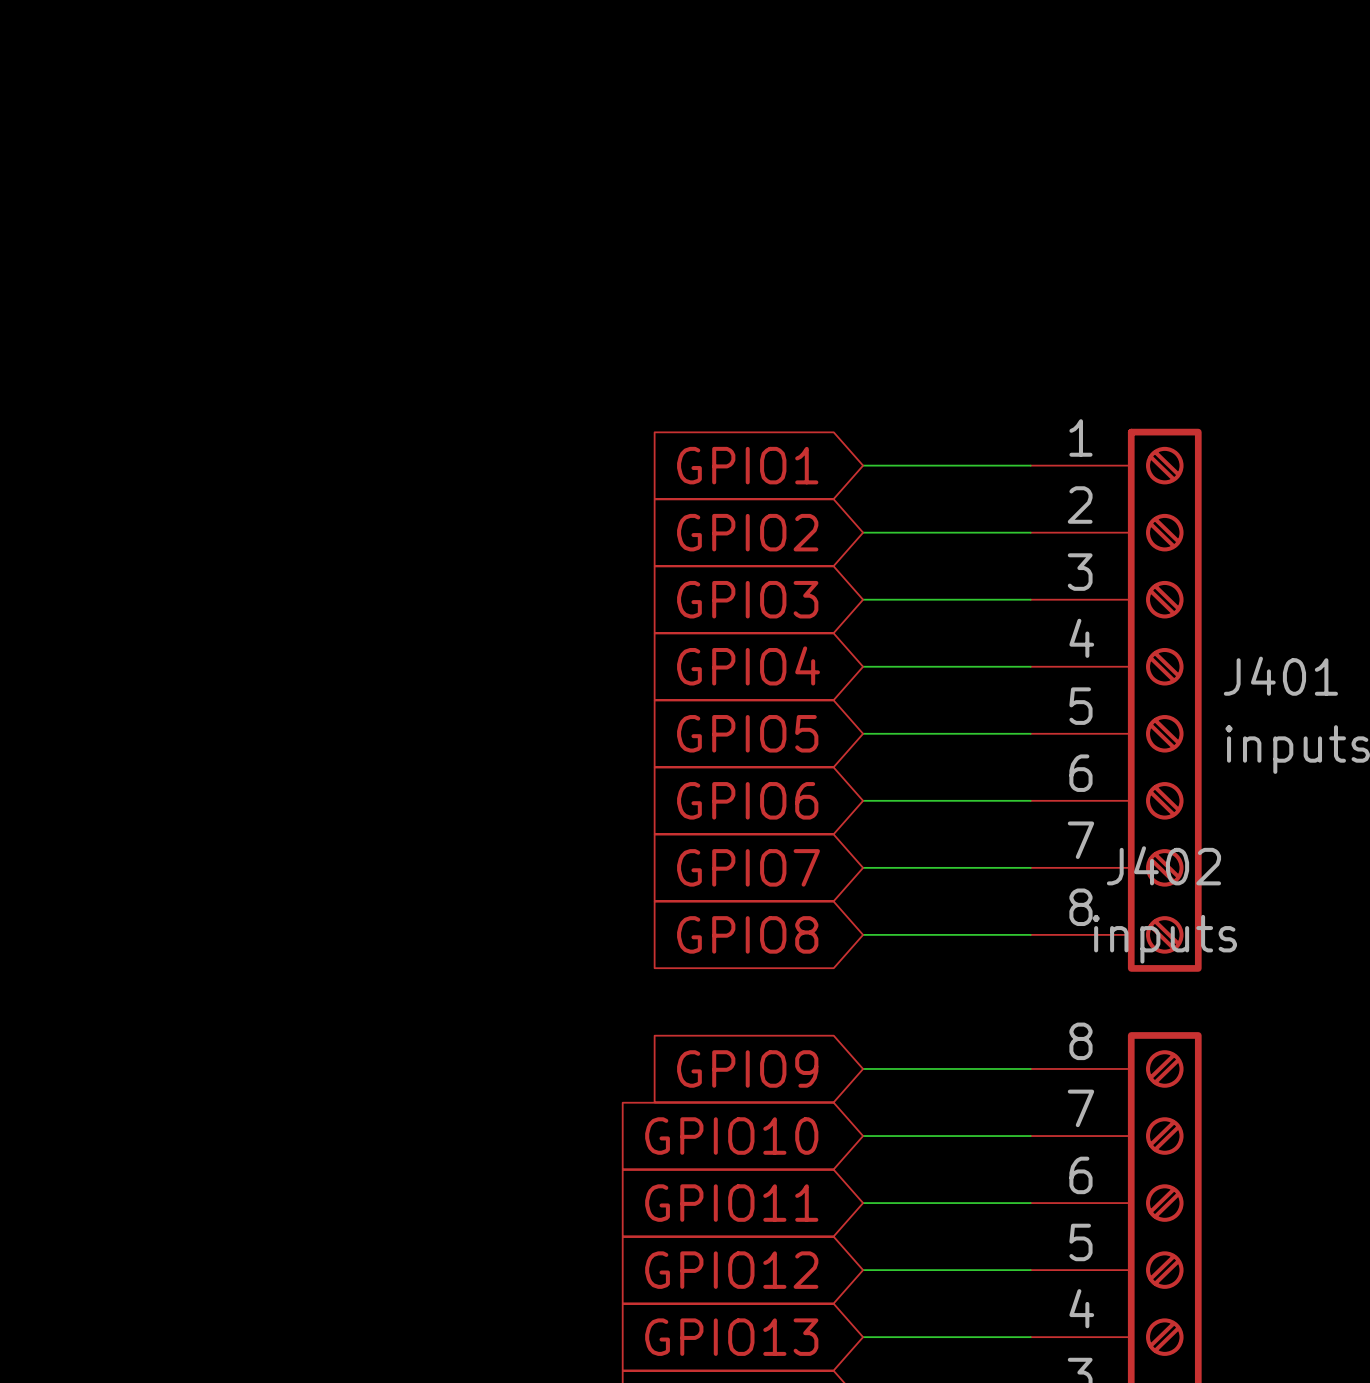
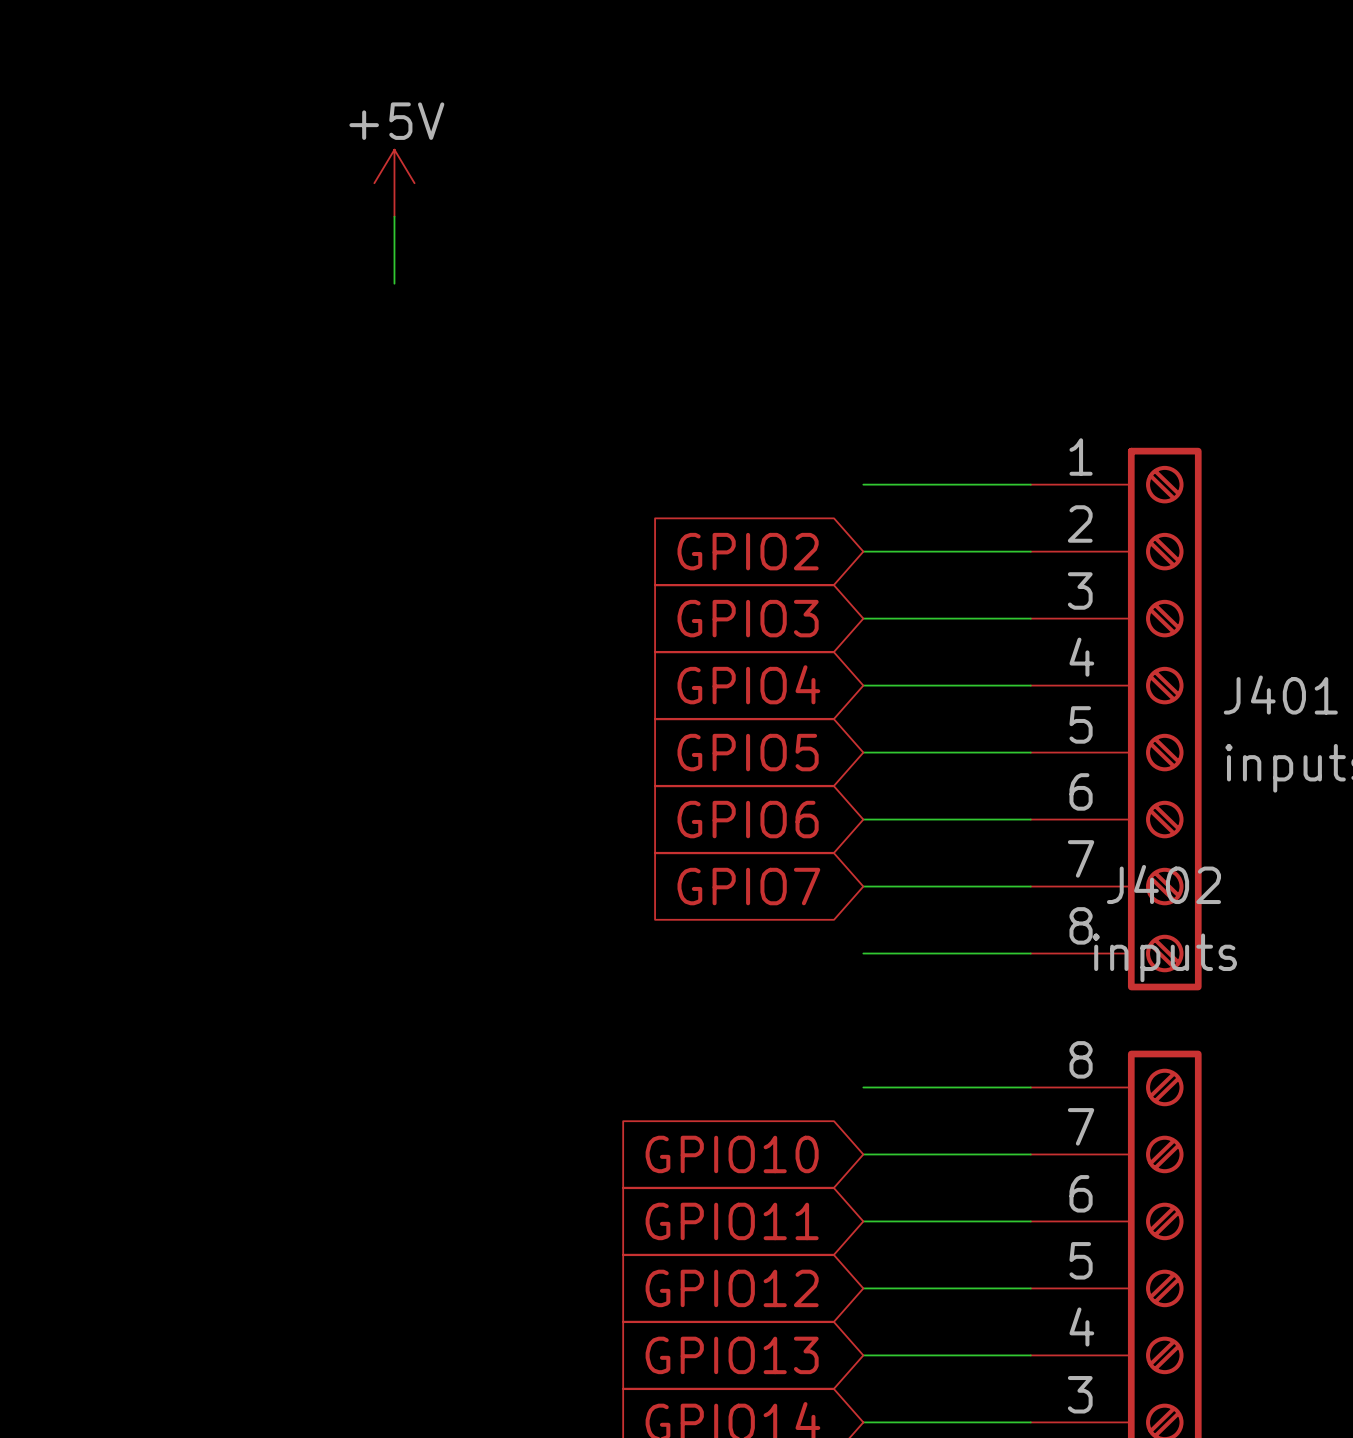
power symbol: none -> +5V (394, 183)
wire: none -> (394, 216) (394, 283)
global label: GPIO1 (747, 465) -> none
global label: GPIO8 (747, 934) -> none
global label: GPIO9 (747, 1068) -> none

